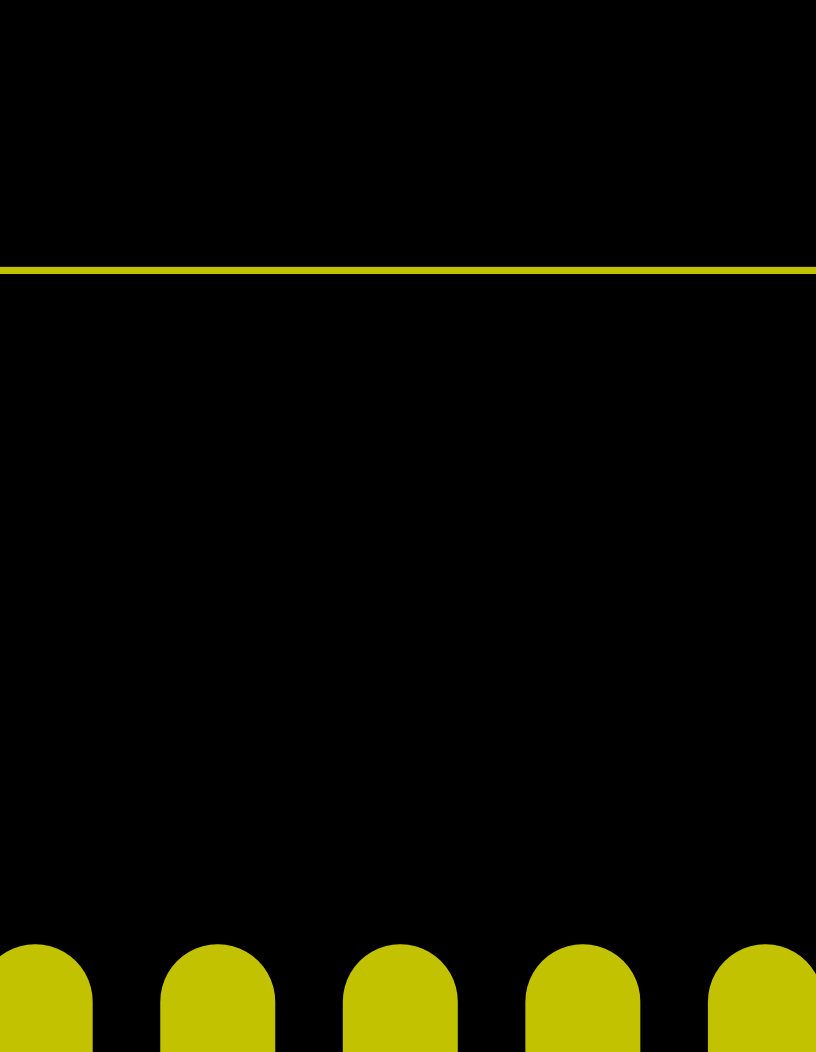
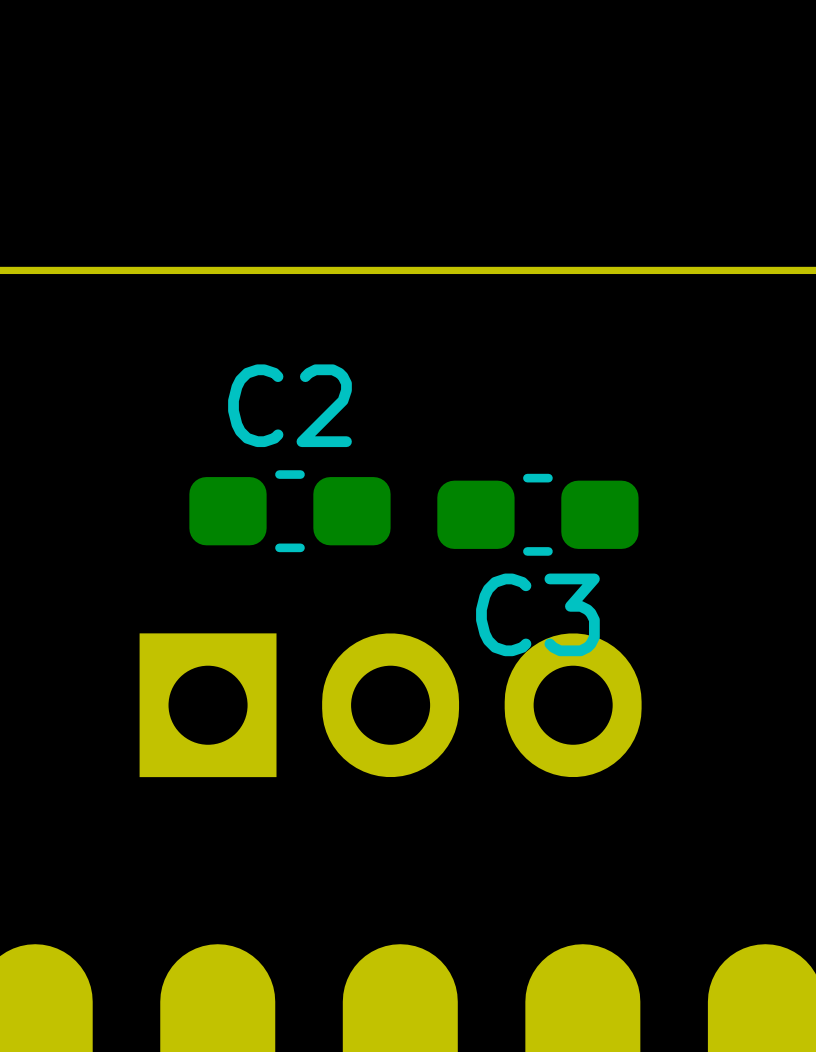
C2: none -> (289, 511)
C3: none -> (537, 514)
part: none -> (390, 705)

